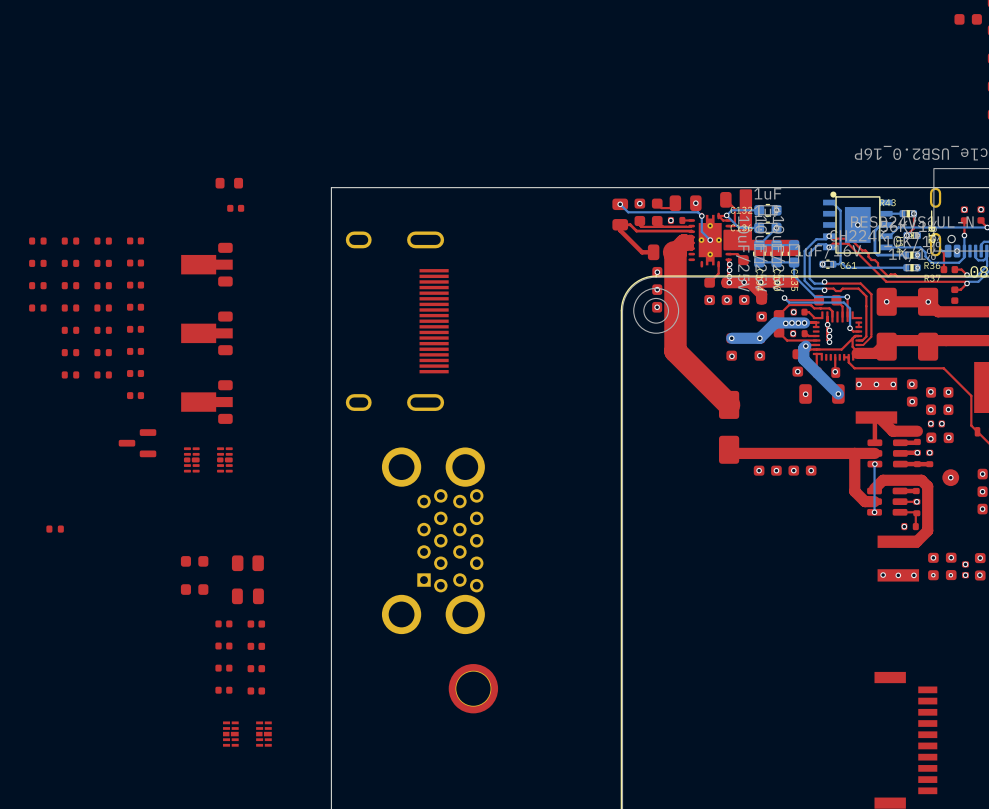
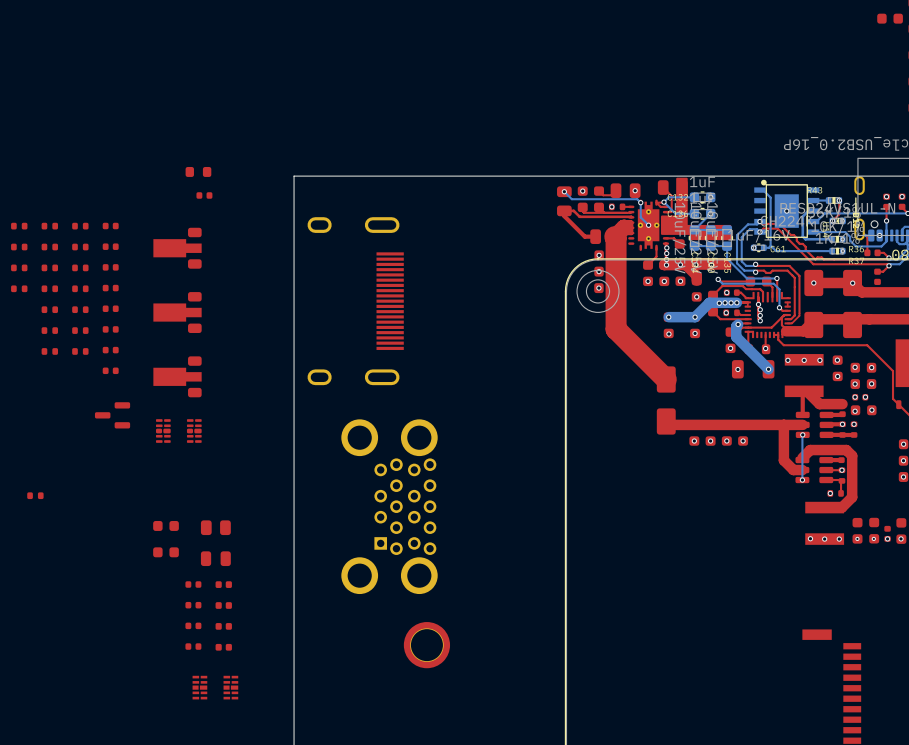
part: (950, 477) -> none
via: (950, 477) -> none
via: (933, 557) -> none
via: (951, 557) -> none
via: (980, 558) -> none
via: (965, 564) -> none

